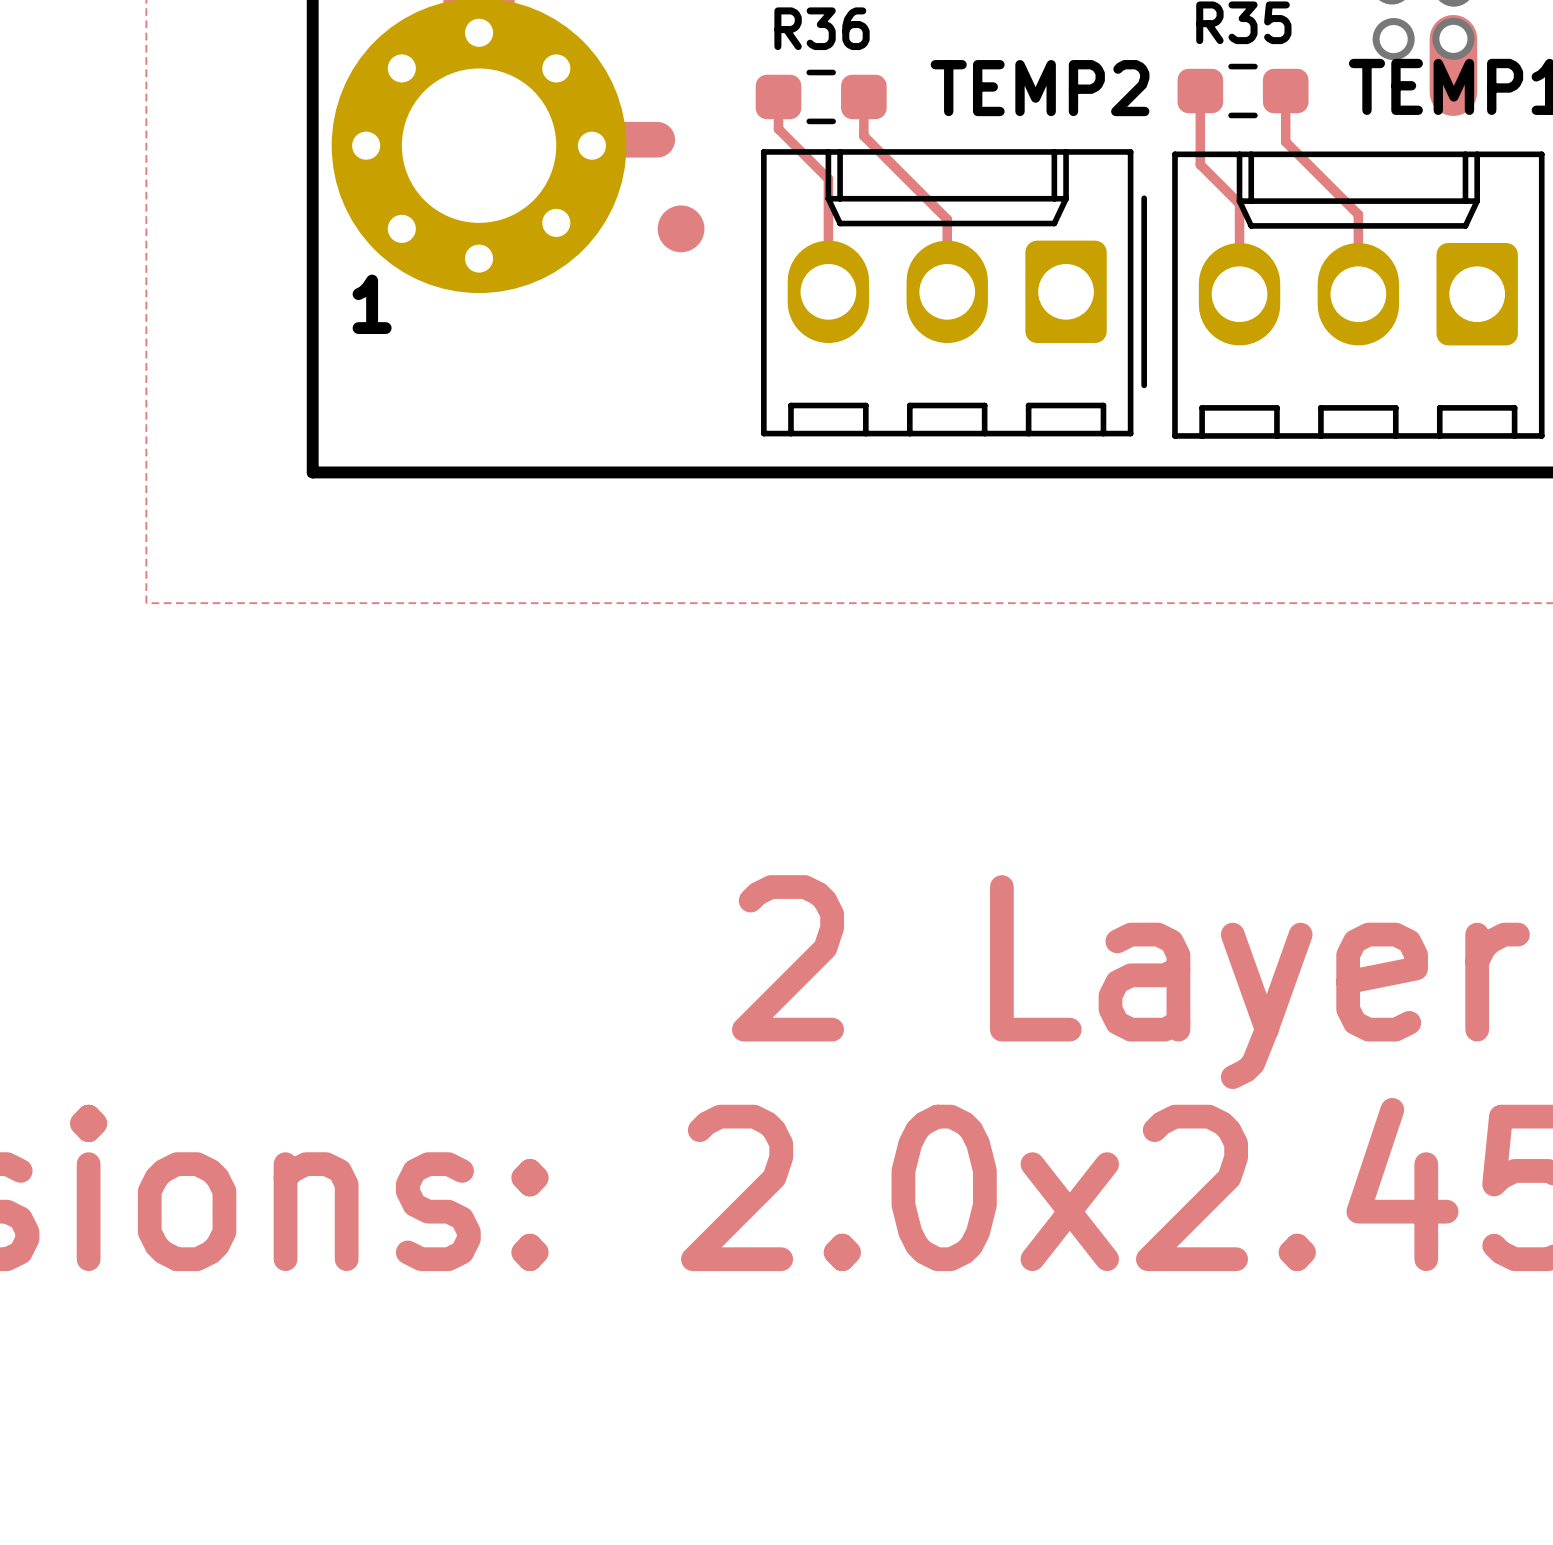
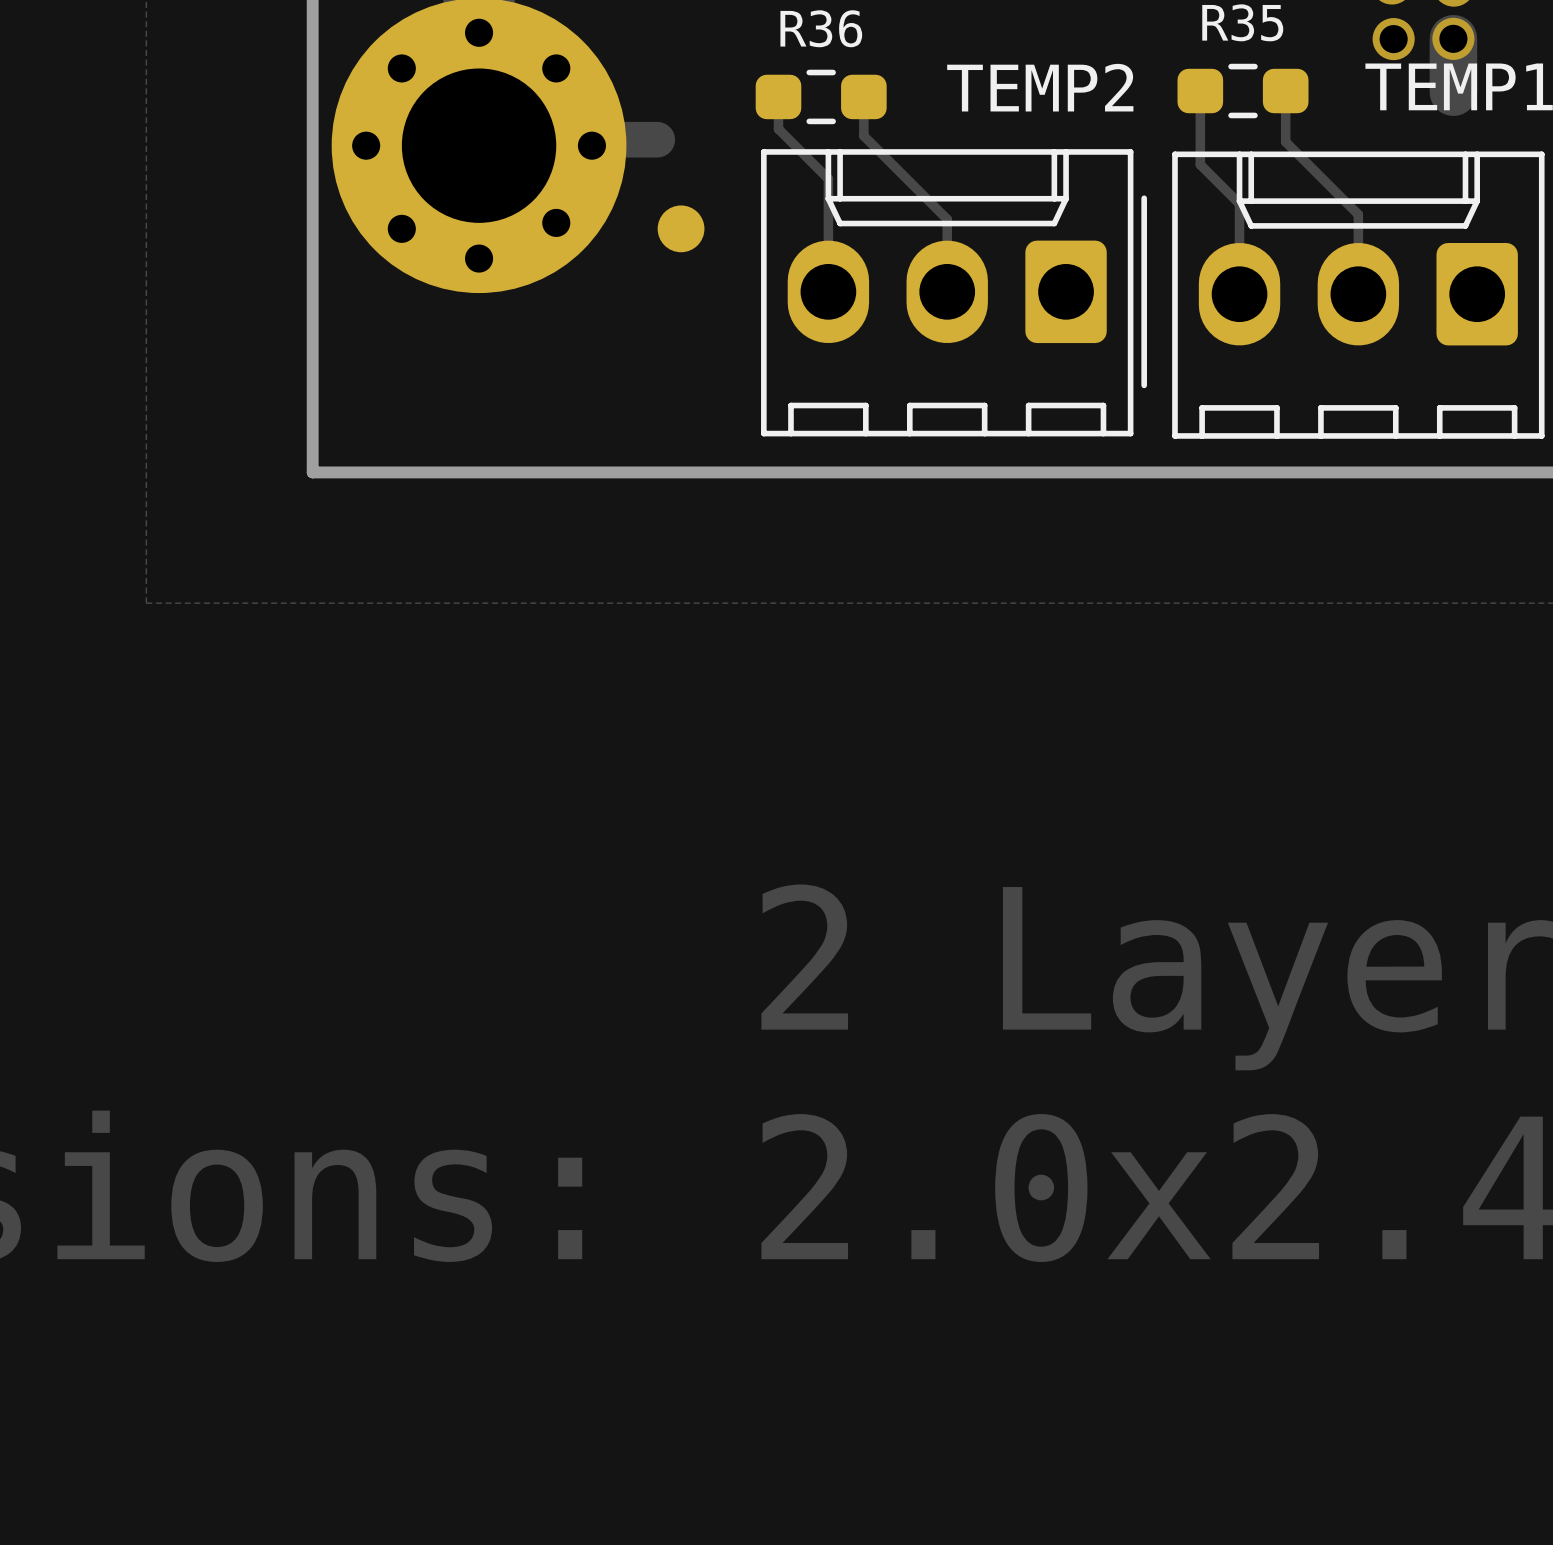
text: 1 (372, 304) -> none

